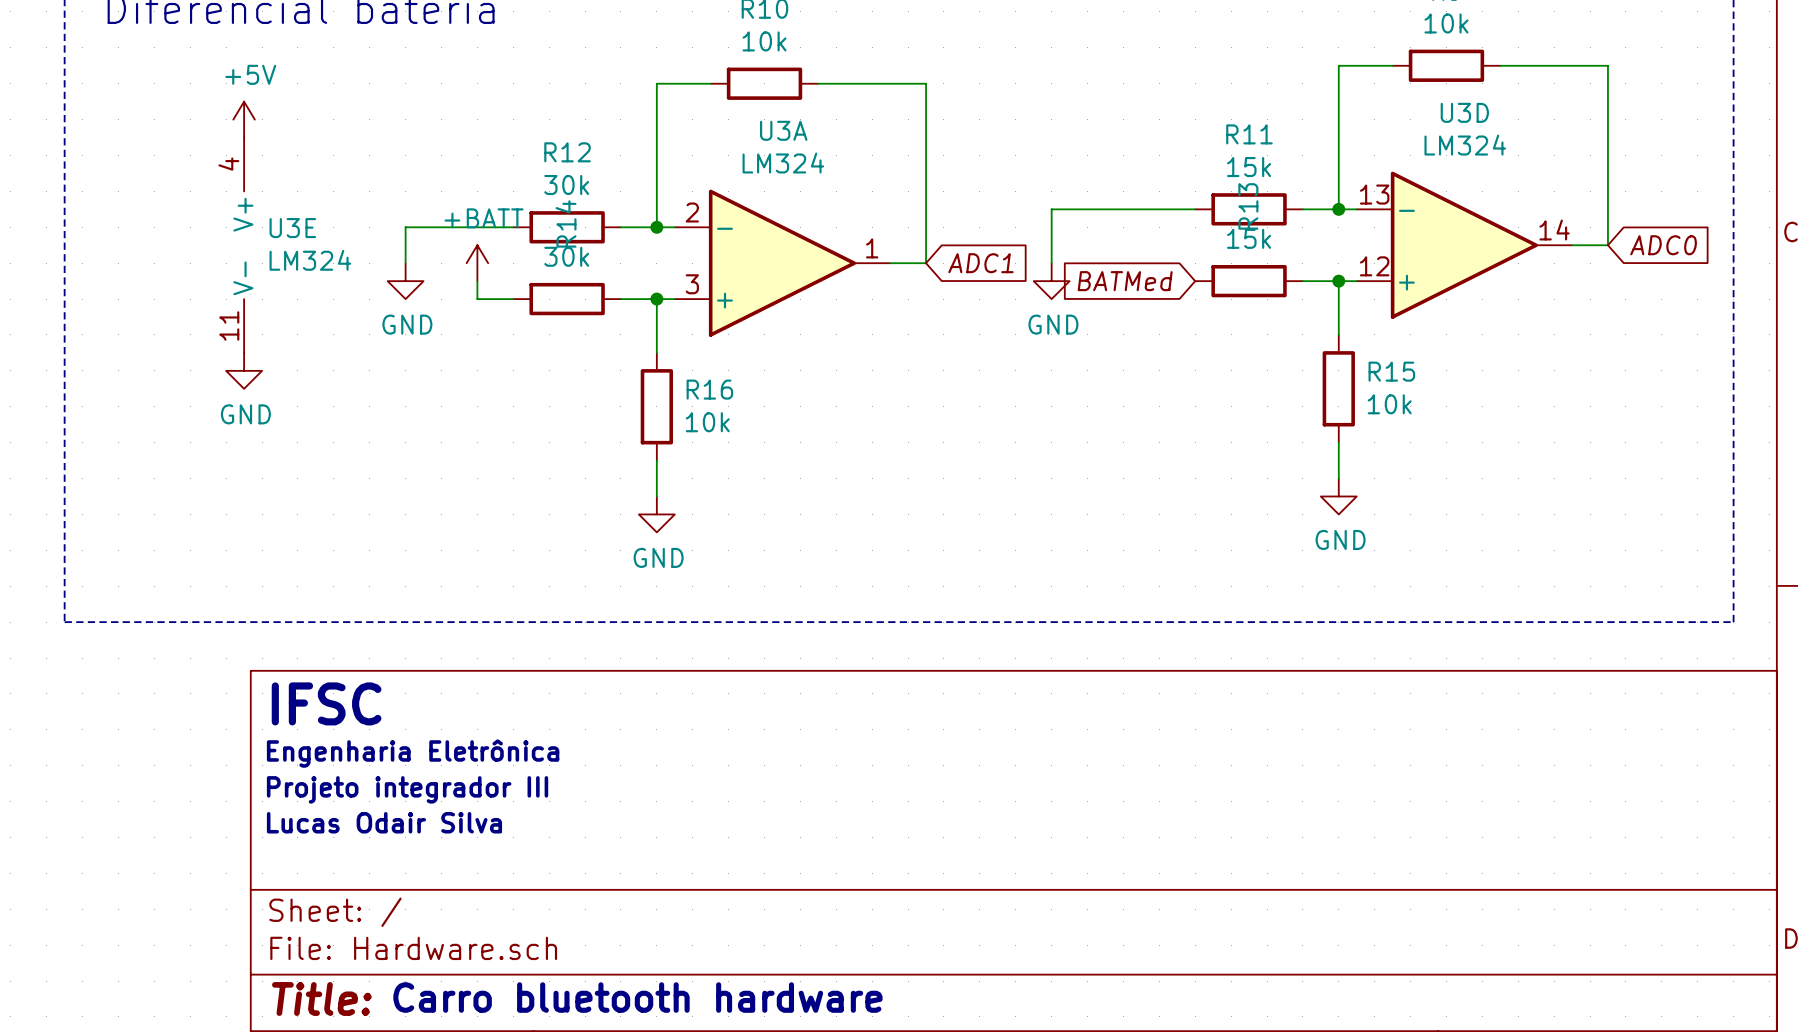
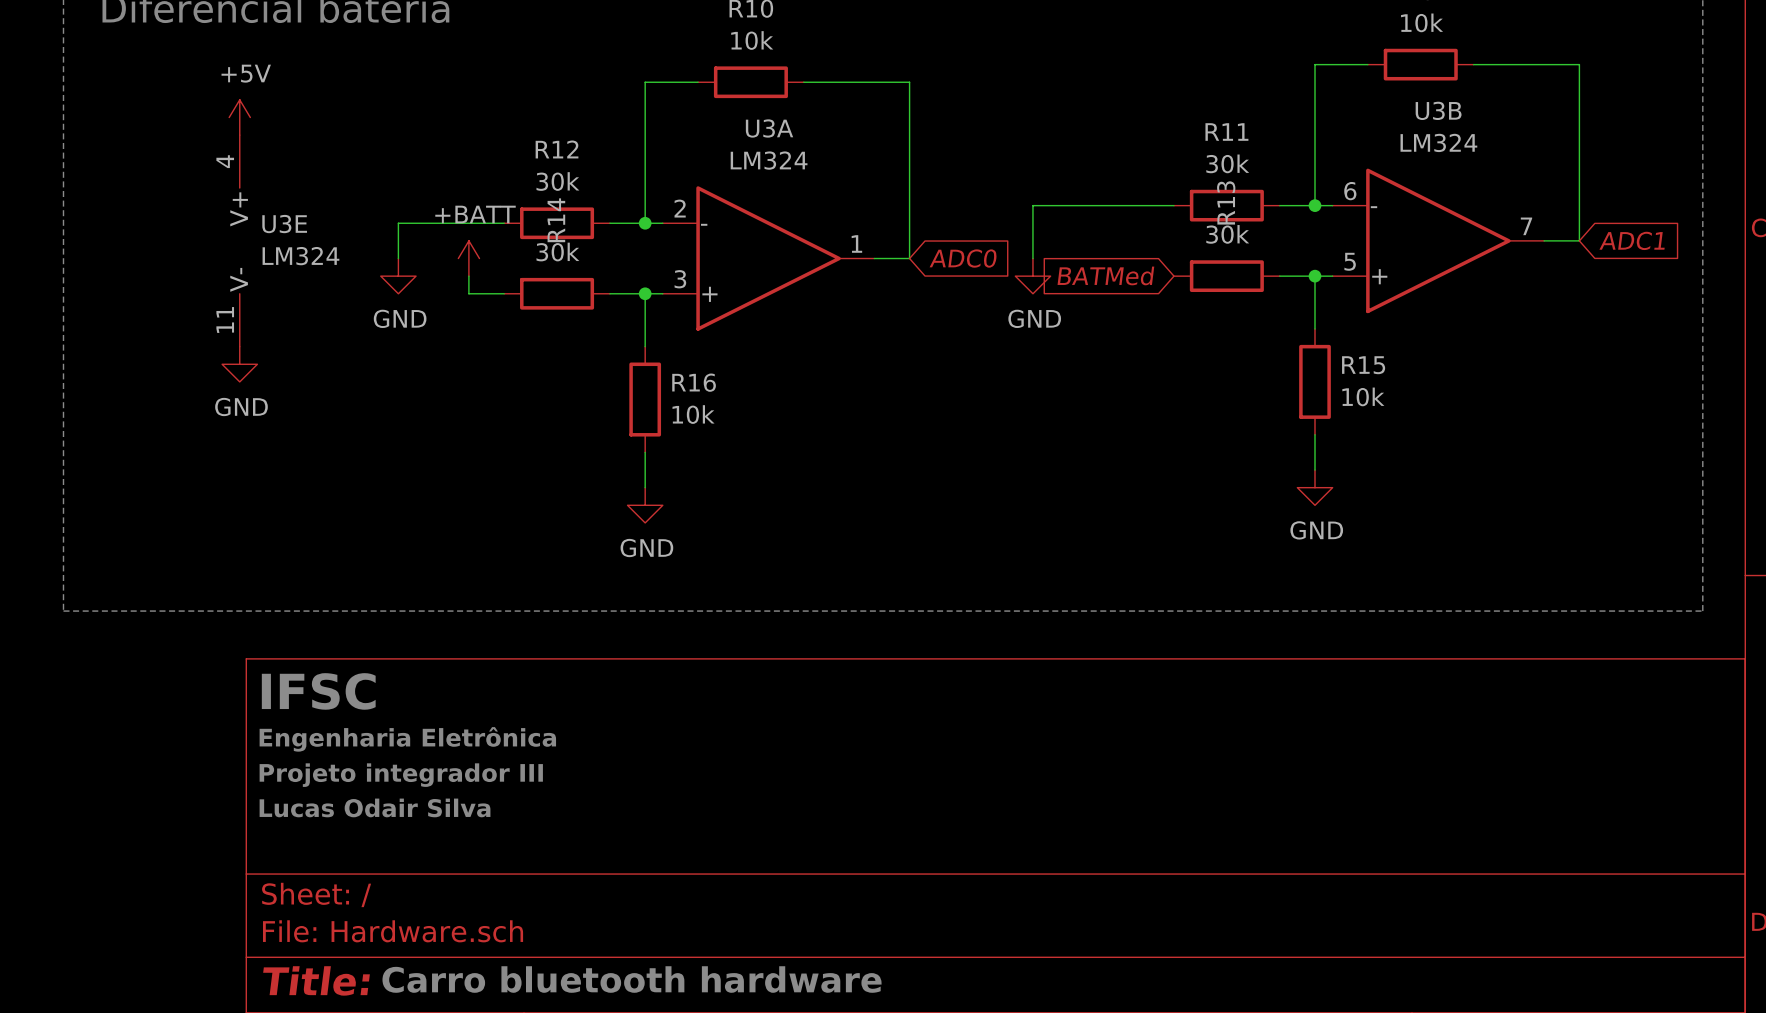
U3D name: U3D (1464, 112) -> U3B (1438, 110)
R11 value: 15k (1249, 167) -> 30k (1227, 163)
U3D pin number: 13 (1374, 194) -> 6 (1350, 191)
U3D pin number: 14 (1554, 230) -> 7 (1526, 226)
R13 value: 15k (1249, 238) -> 30k (1227, 234)
global label: ADC0 (1663, 245) -> ADC1 (1632, 240)
global label: ADC1 (980, 263) -> ADC0 (963, 258)
U3D pin number: 12 (1374, 266) -> 5 (1350, 261)

